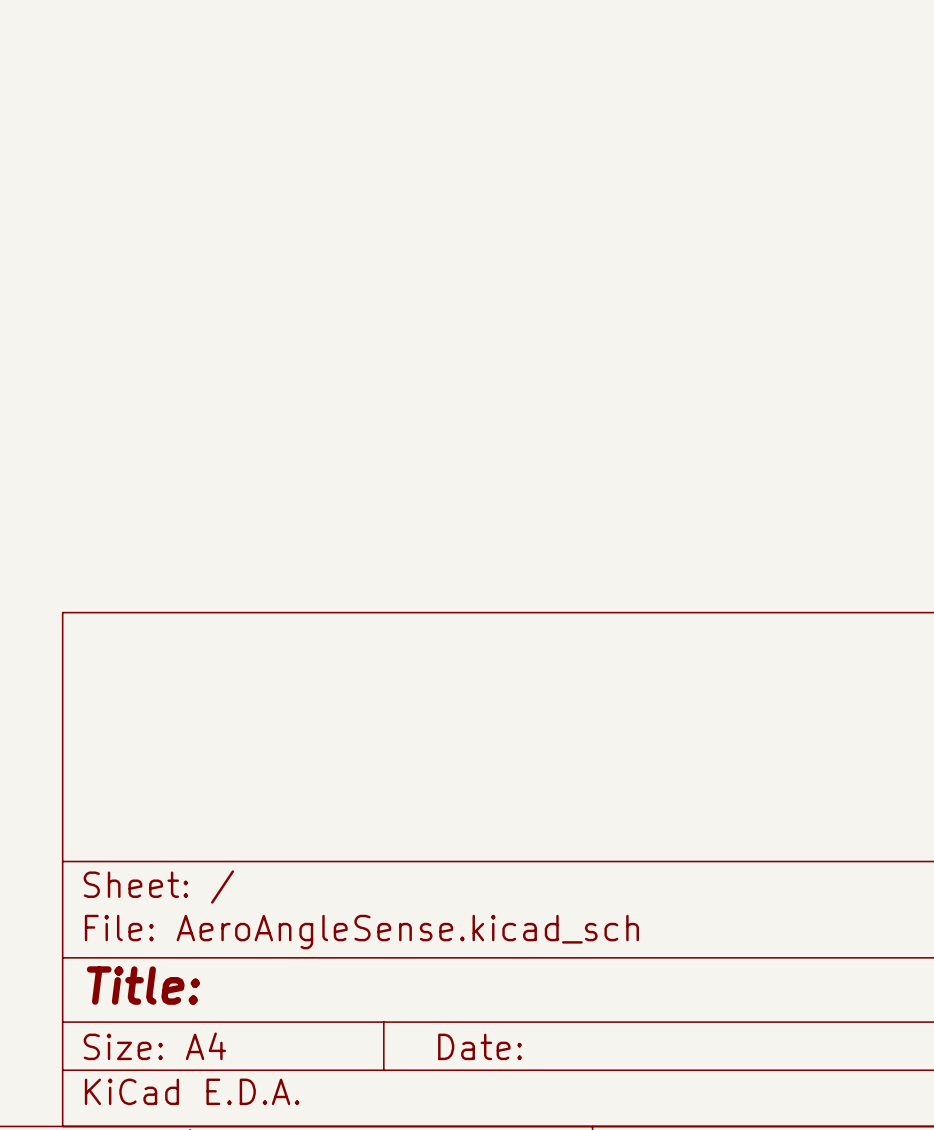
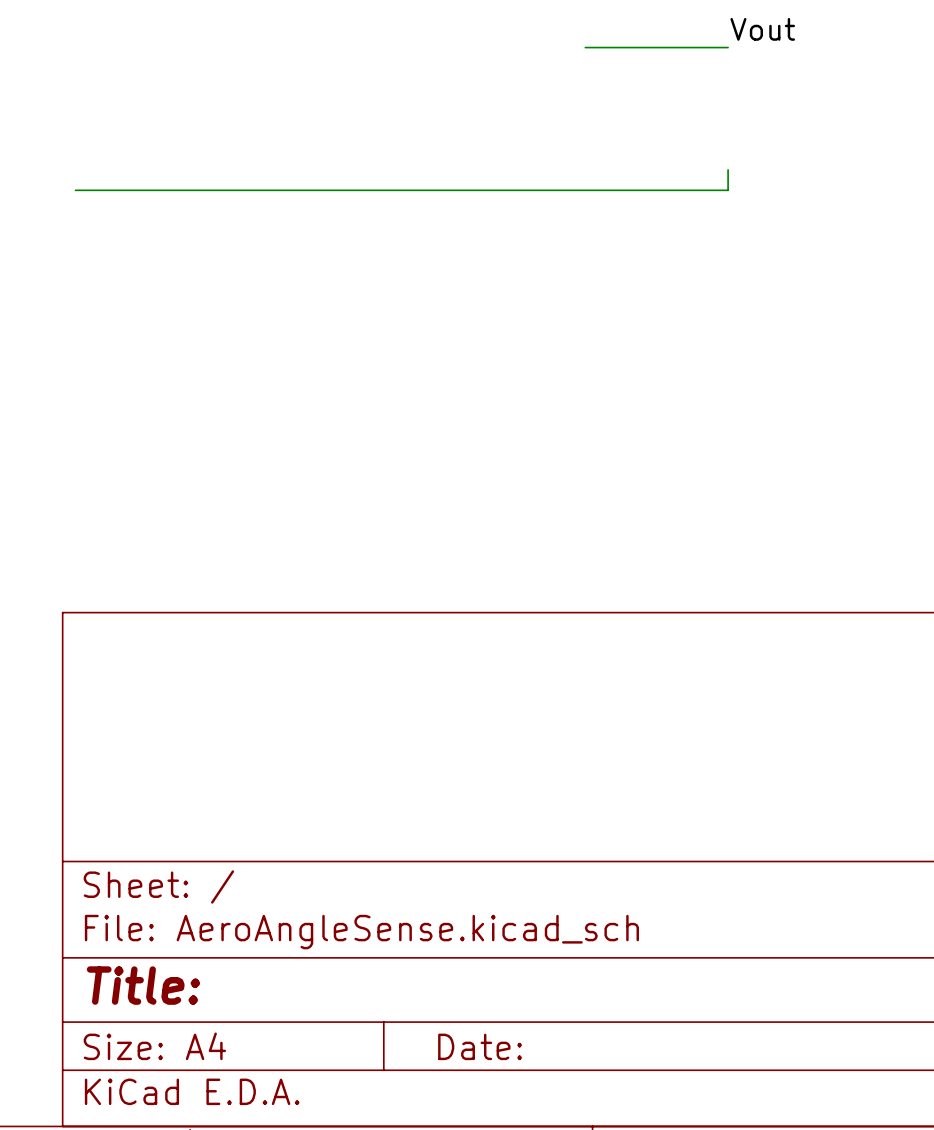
label: none -> Vout (762, 29)
wire: none -> (585, 47) (728, 47)
wire: none -> (728, 169) (728, 190) (75, 190)

